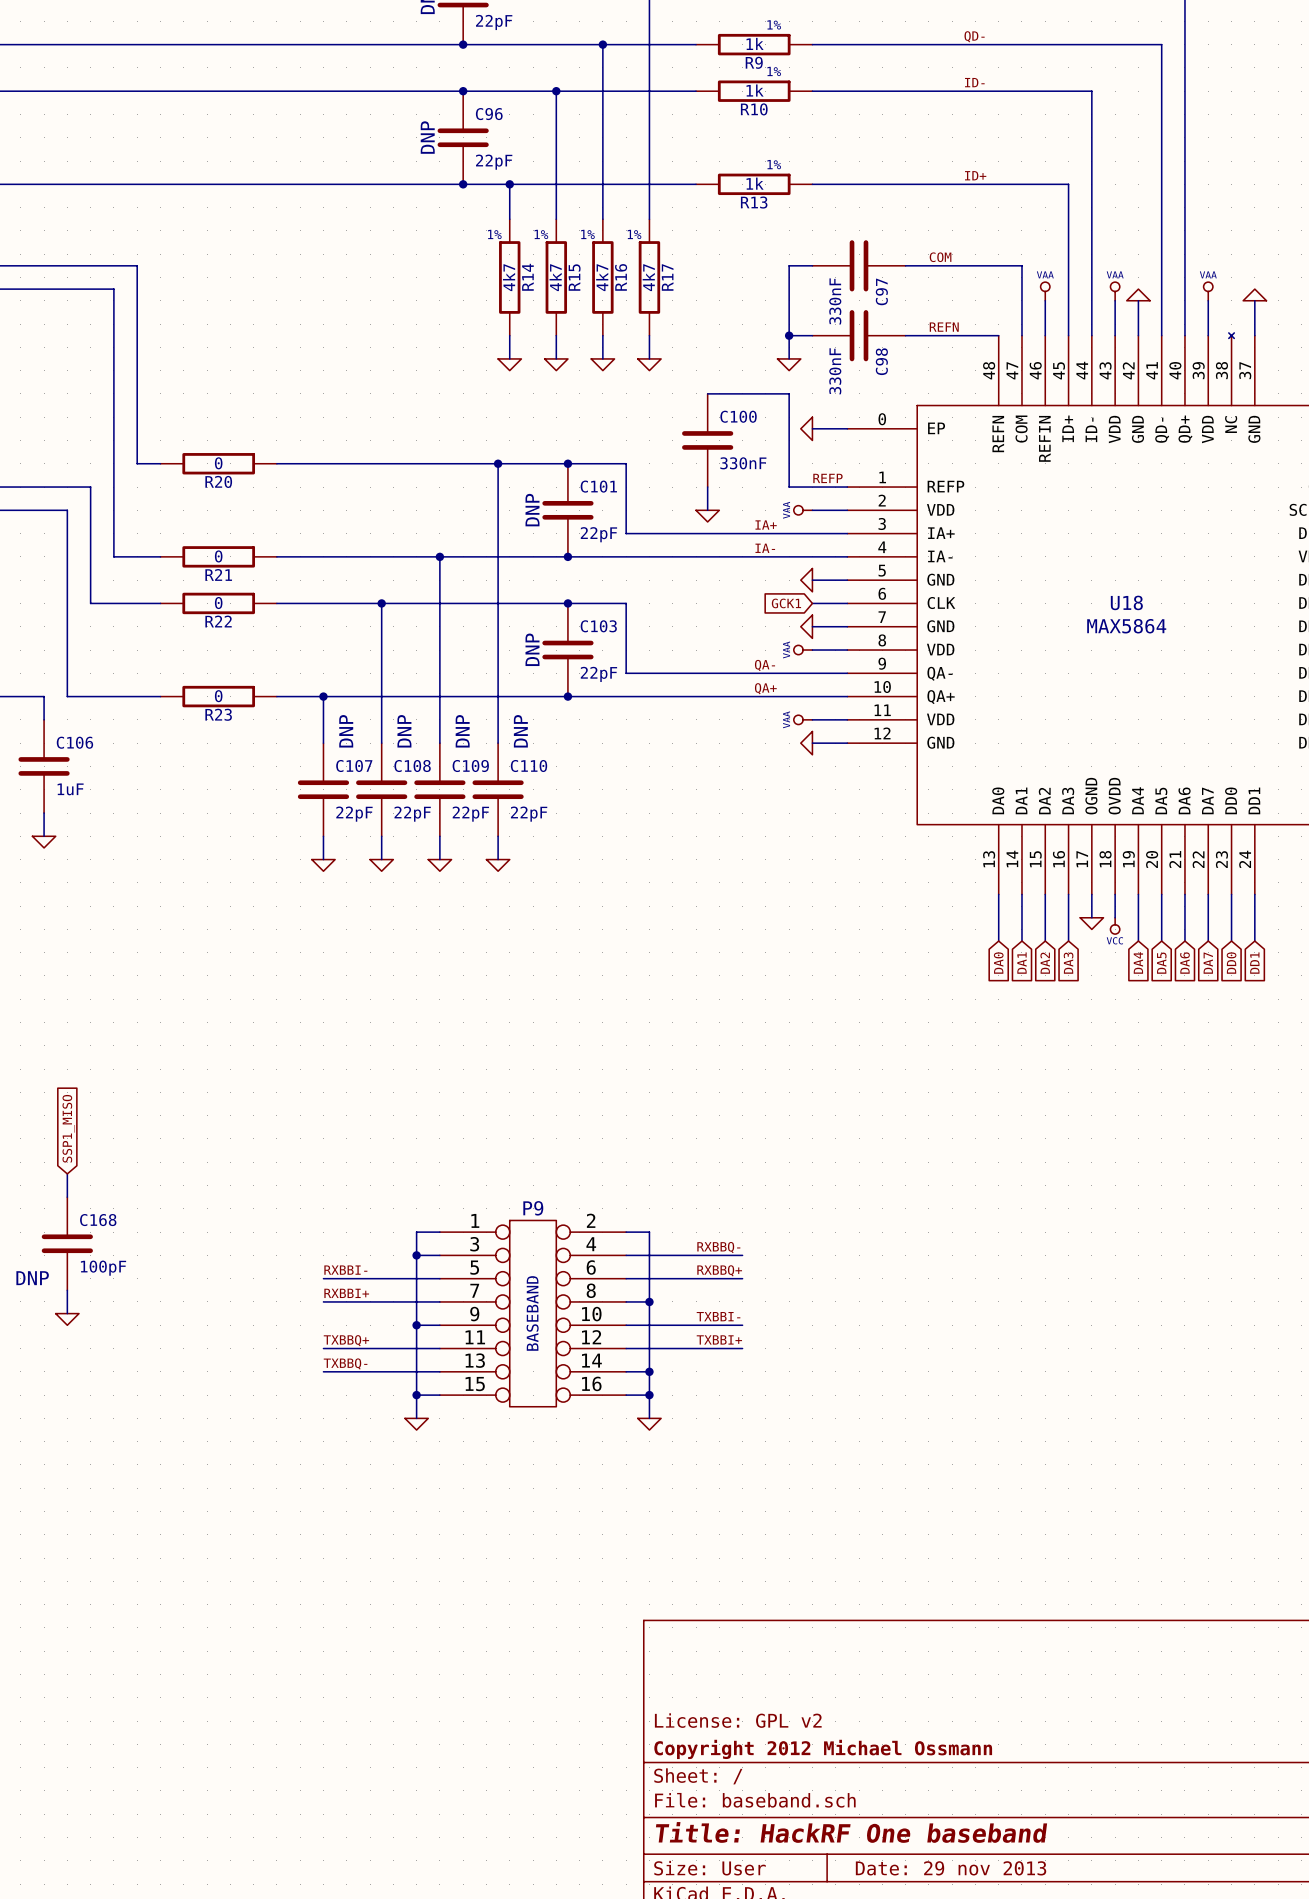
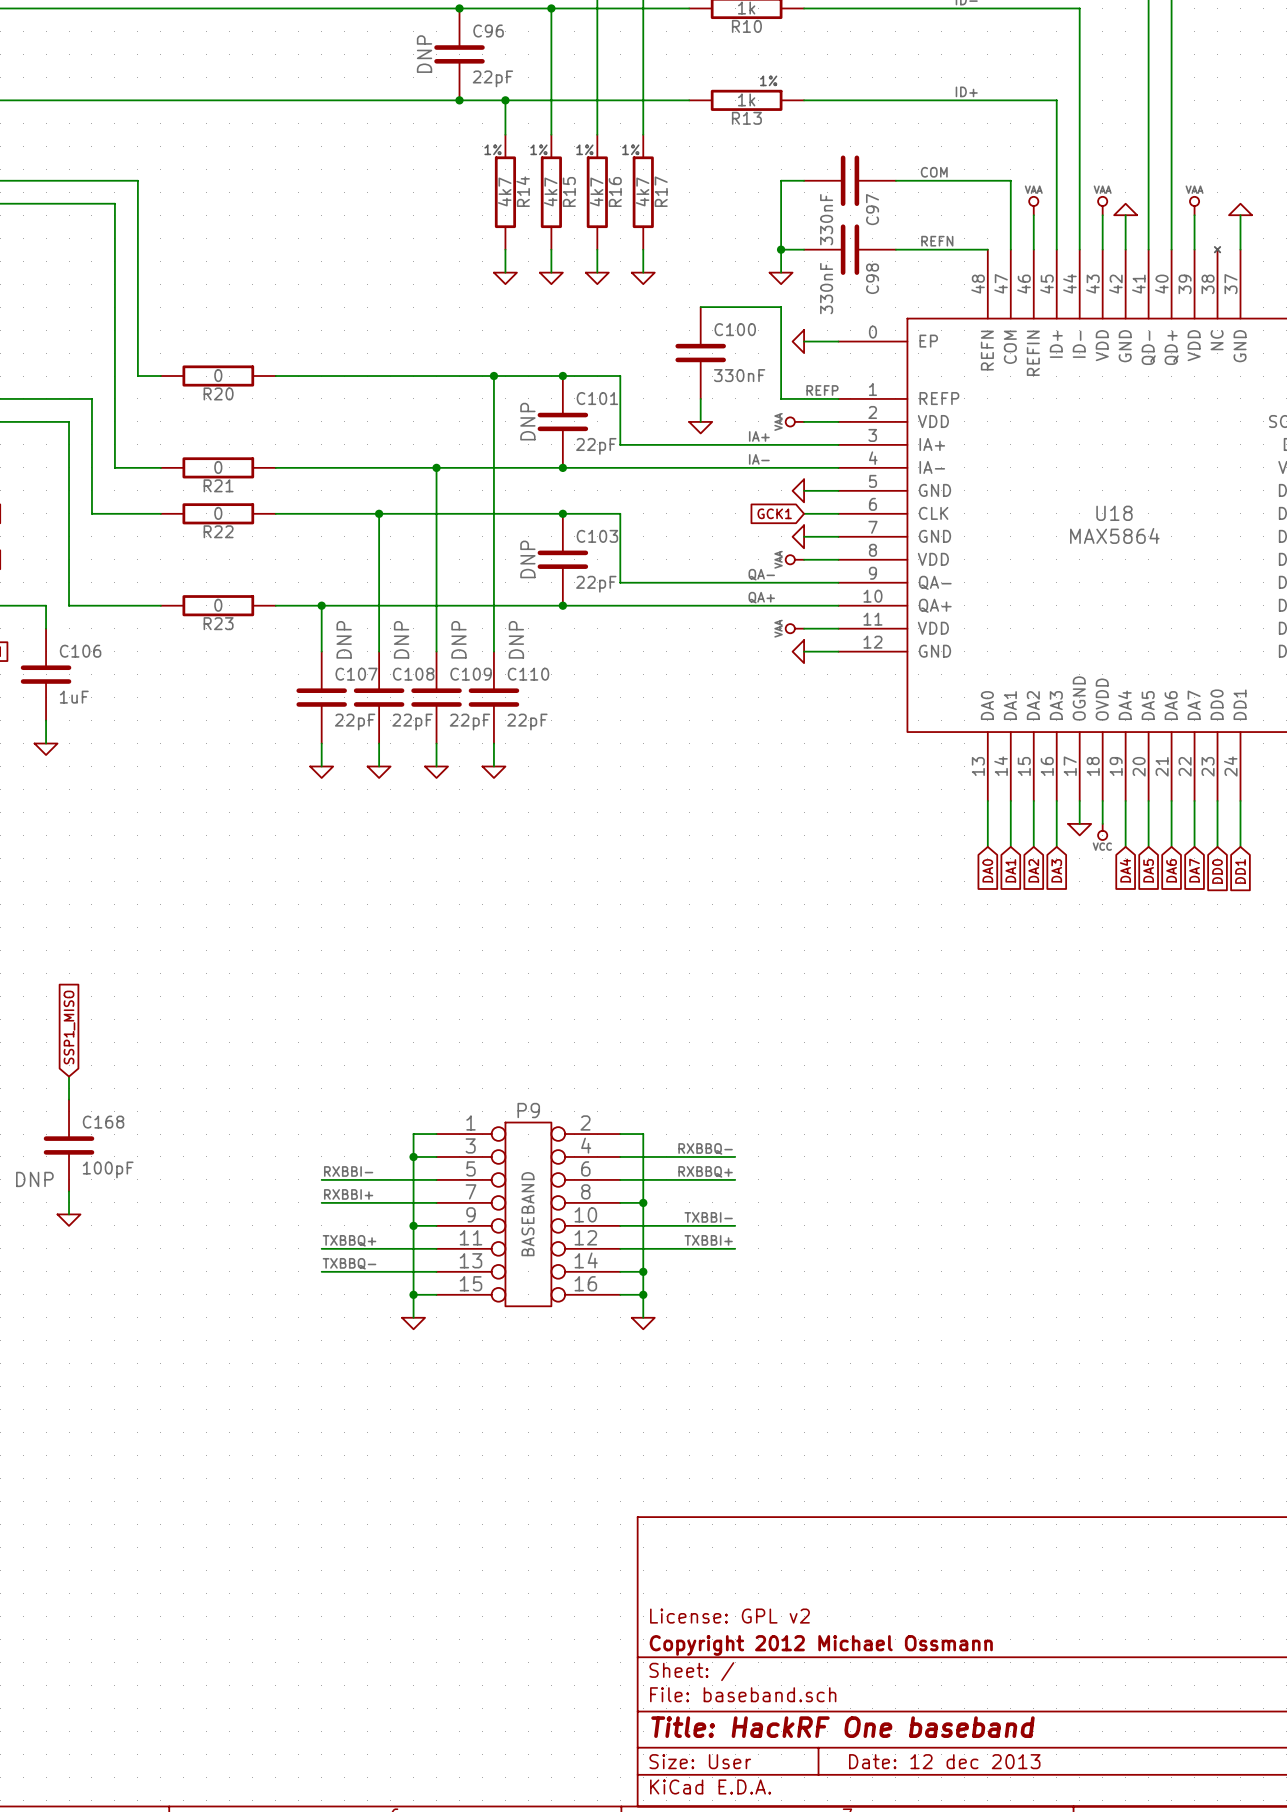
title block: Date: 29 nov 2013 (951, 1868) -> Date: 12 dec 2013 (944, 1761)

